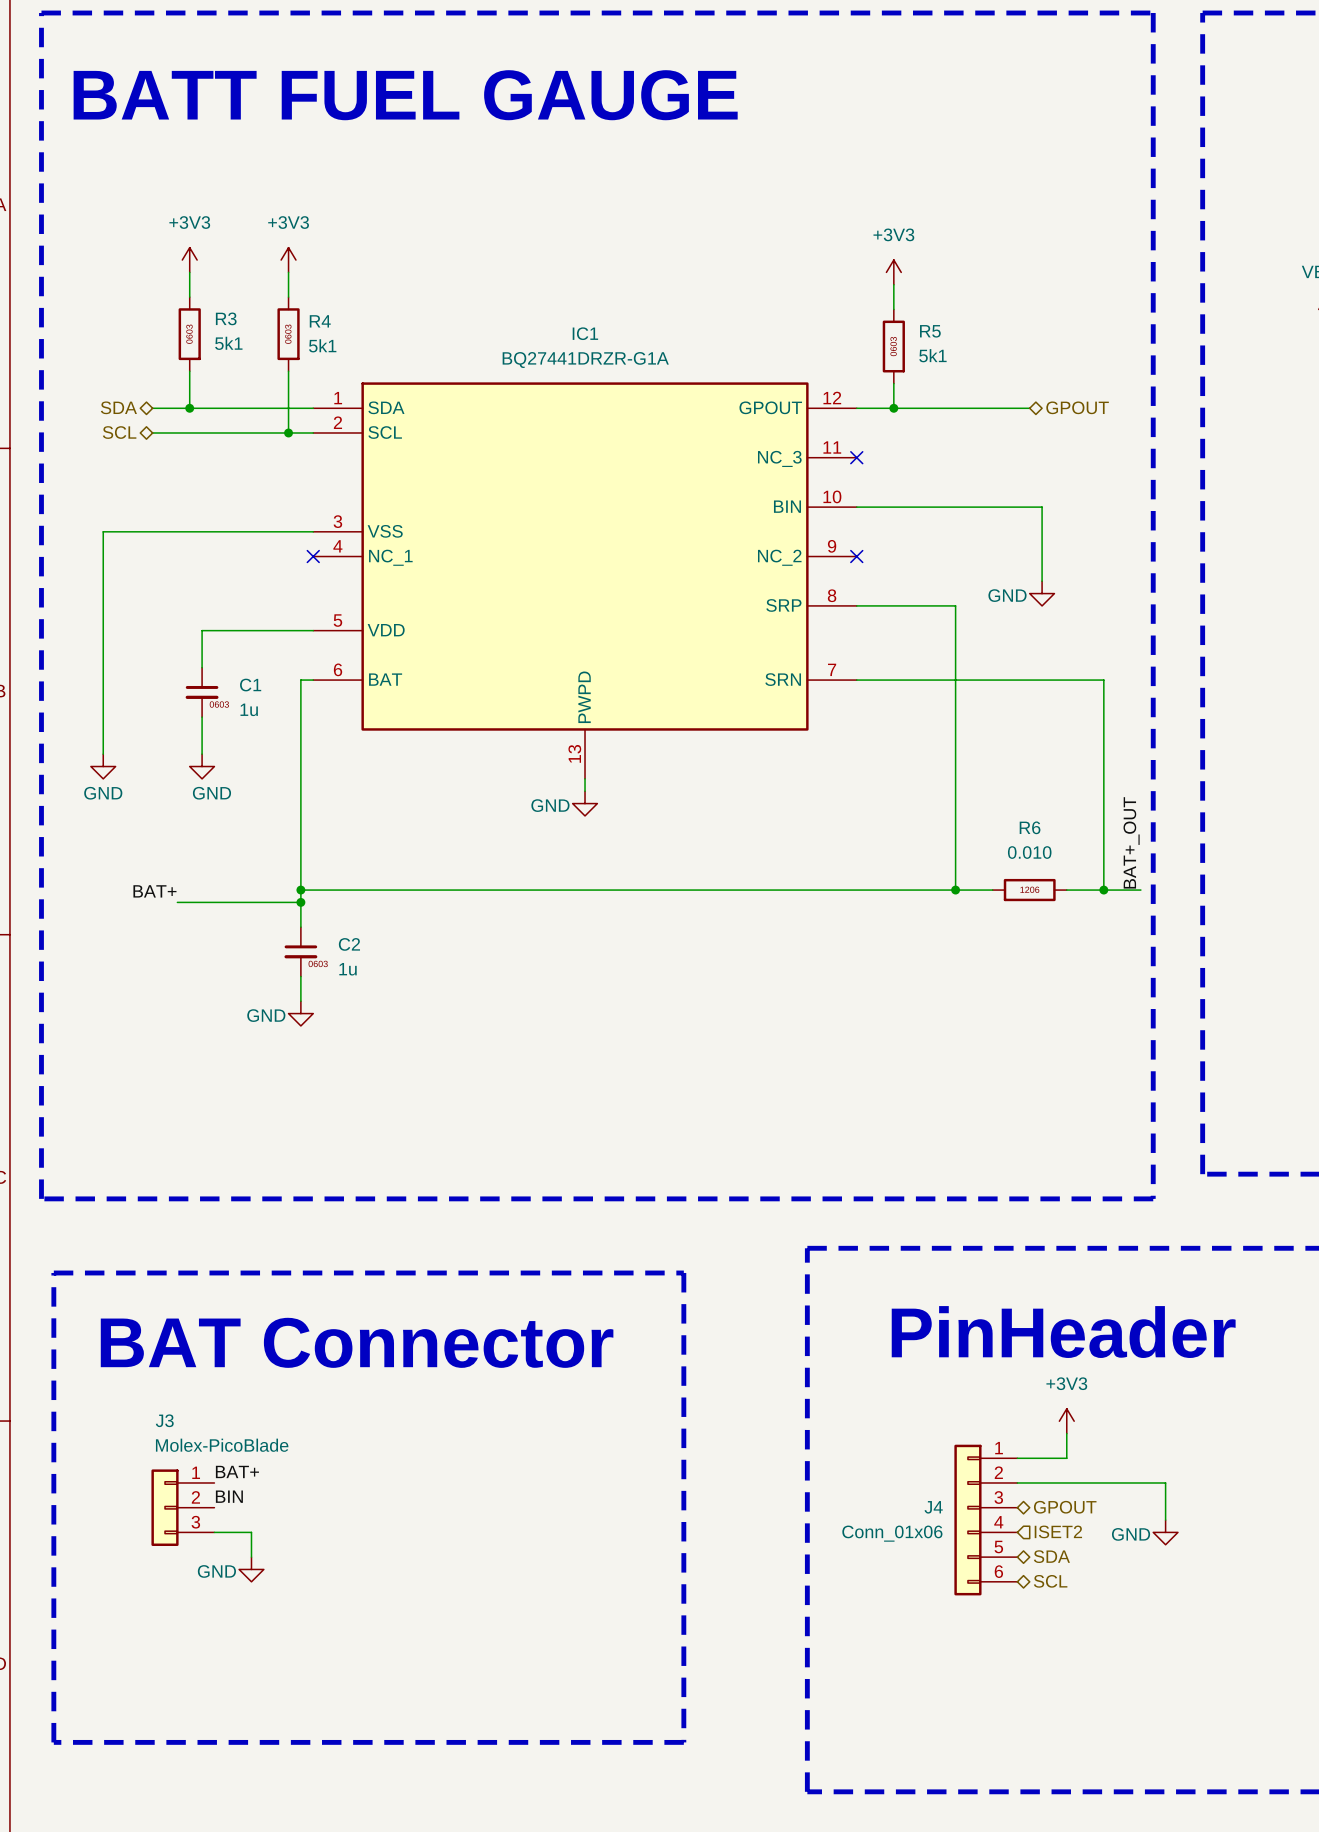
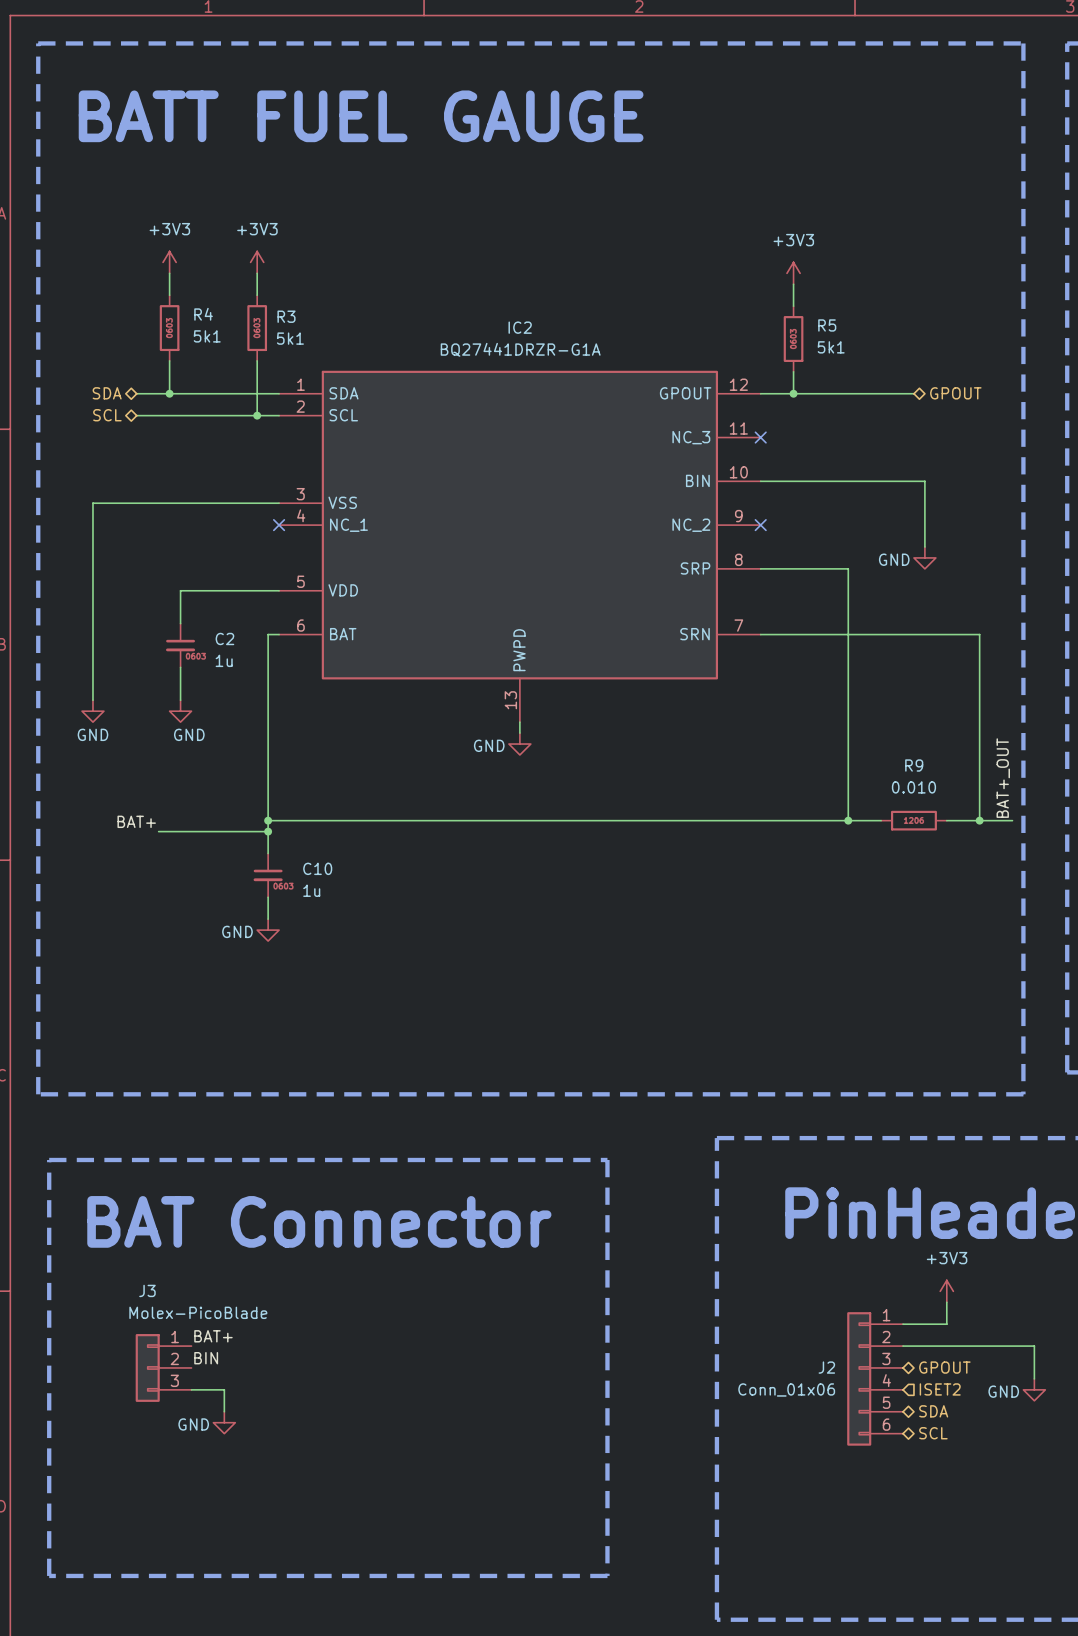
R3 name: R3 (226, 318) -> R4 (203, 314)
R4 name: R4 (320, 321) -> R3 (286, 316)
IC1 name: IC1 (585, 333) -> IC2 (520, 327)
C1 name: C1 (250, 685) -> C2 (224, 638)
R6 name: R6 (1030, 827) -> R9 (914, 765)
C2 name: C2 (349, 944) -> C10 (317, 868)
J4 name: J4 (933, 1507) -> J2 (826, 1367)

